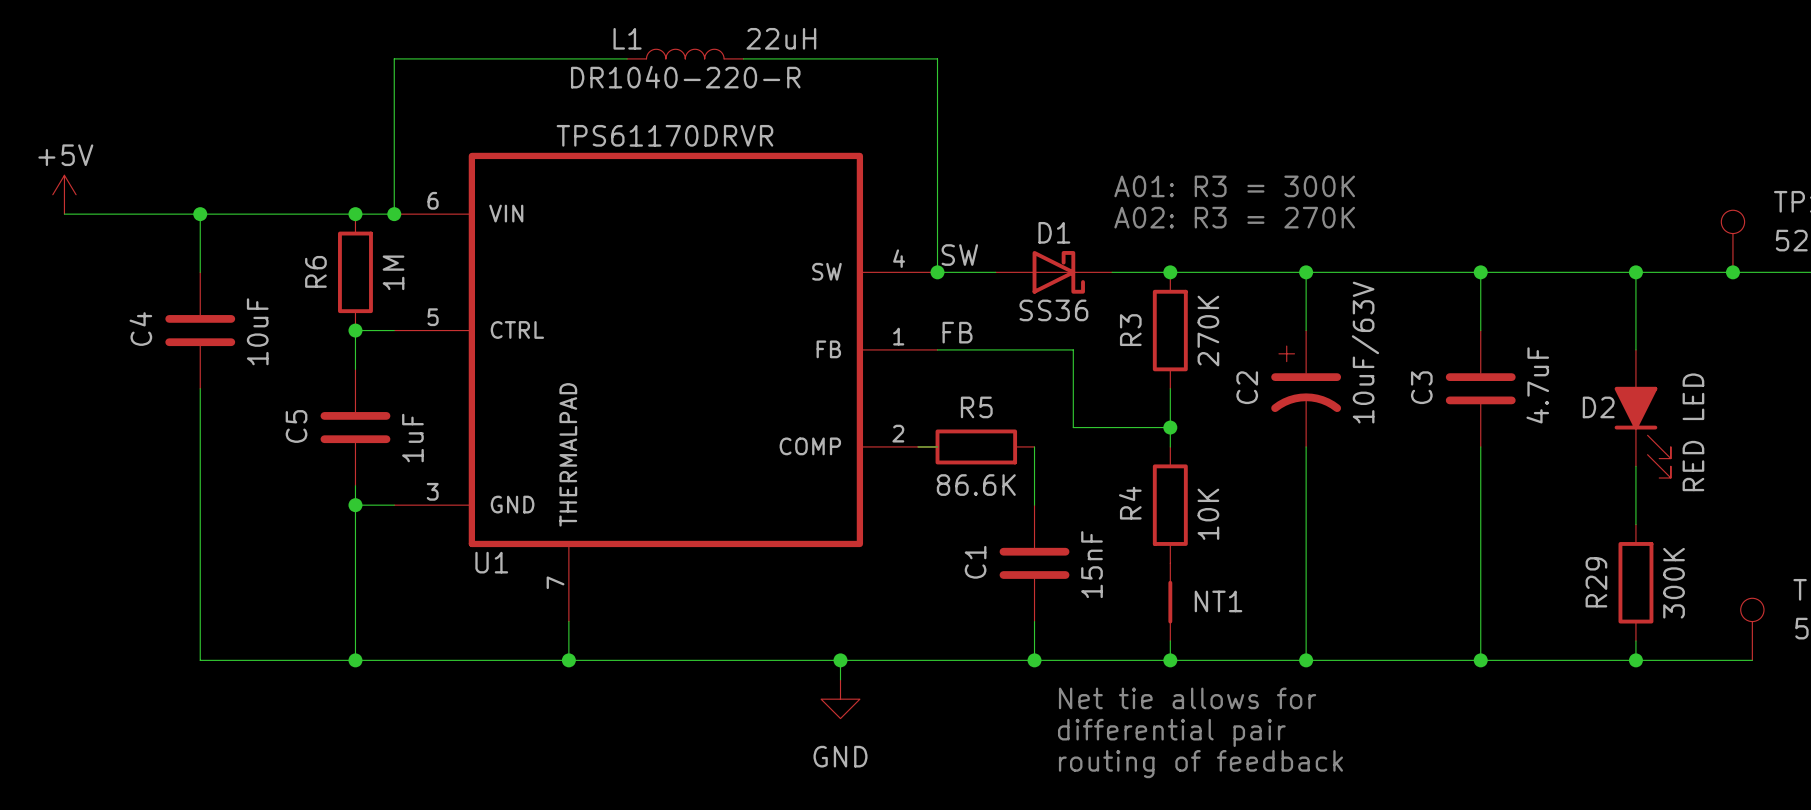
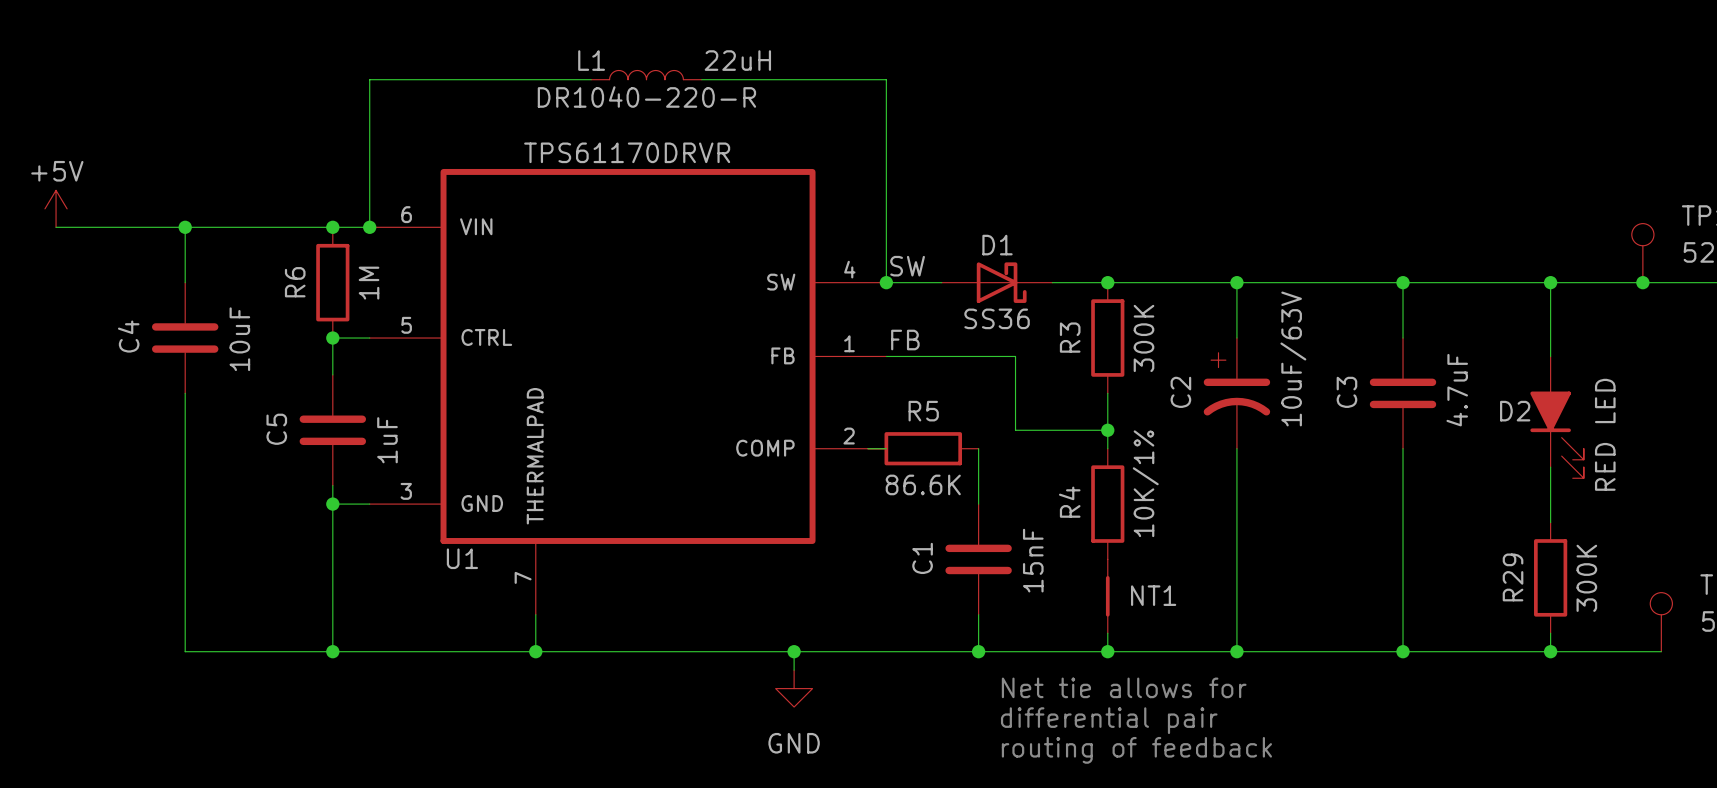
text: A01: R3 = 300K (1234, 186) -> none
text: A02: R3 = 270K (1234, 217) -> none
R3 value: 270K (1208, 331) -> 300K (1143, 338)
R4 value: 10K (1208, 514) -> 10K/1% (1145, 483)

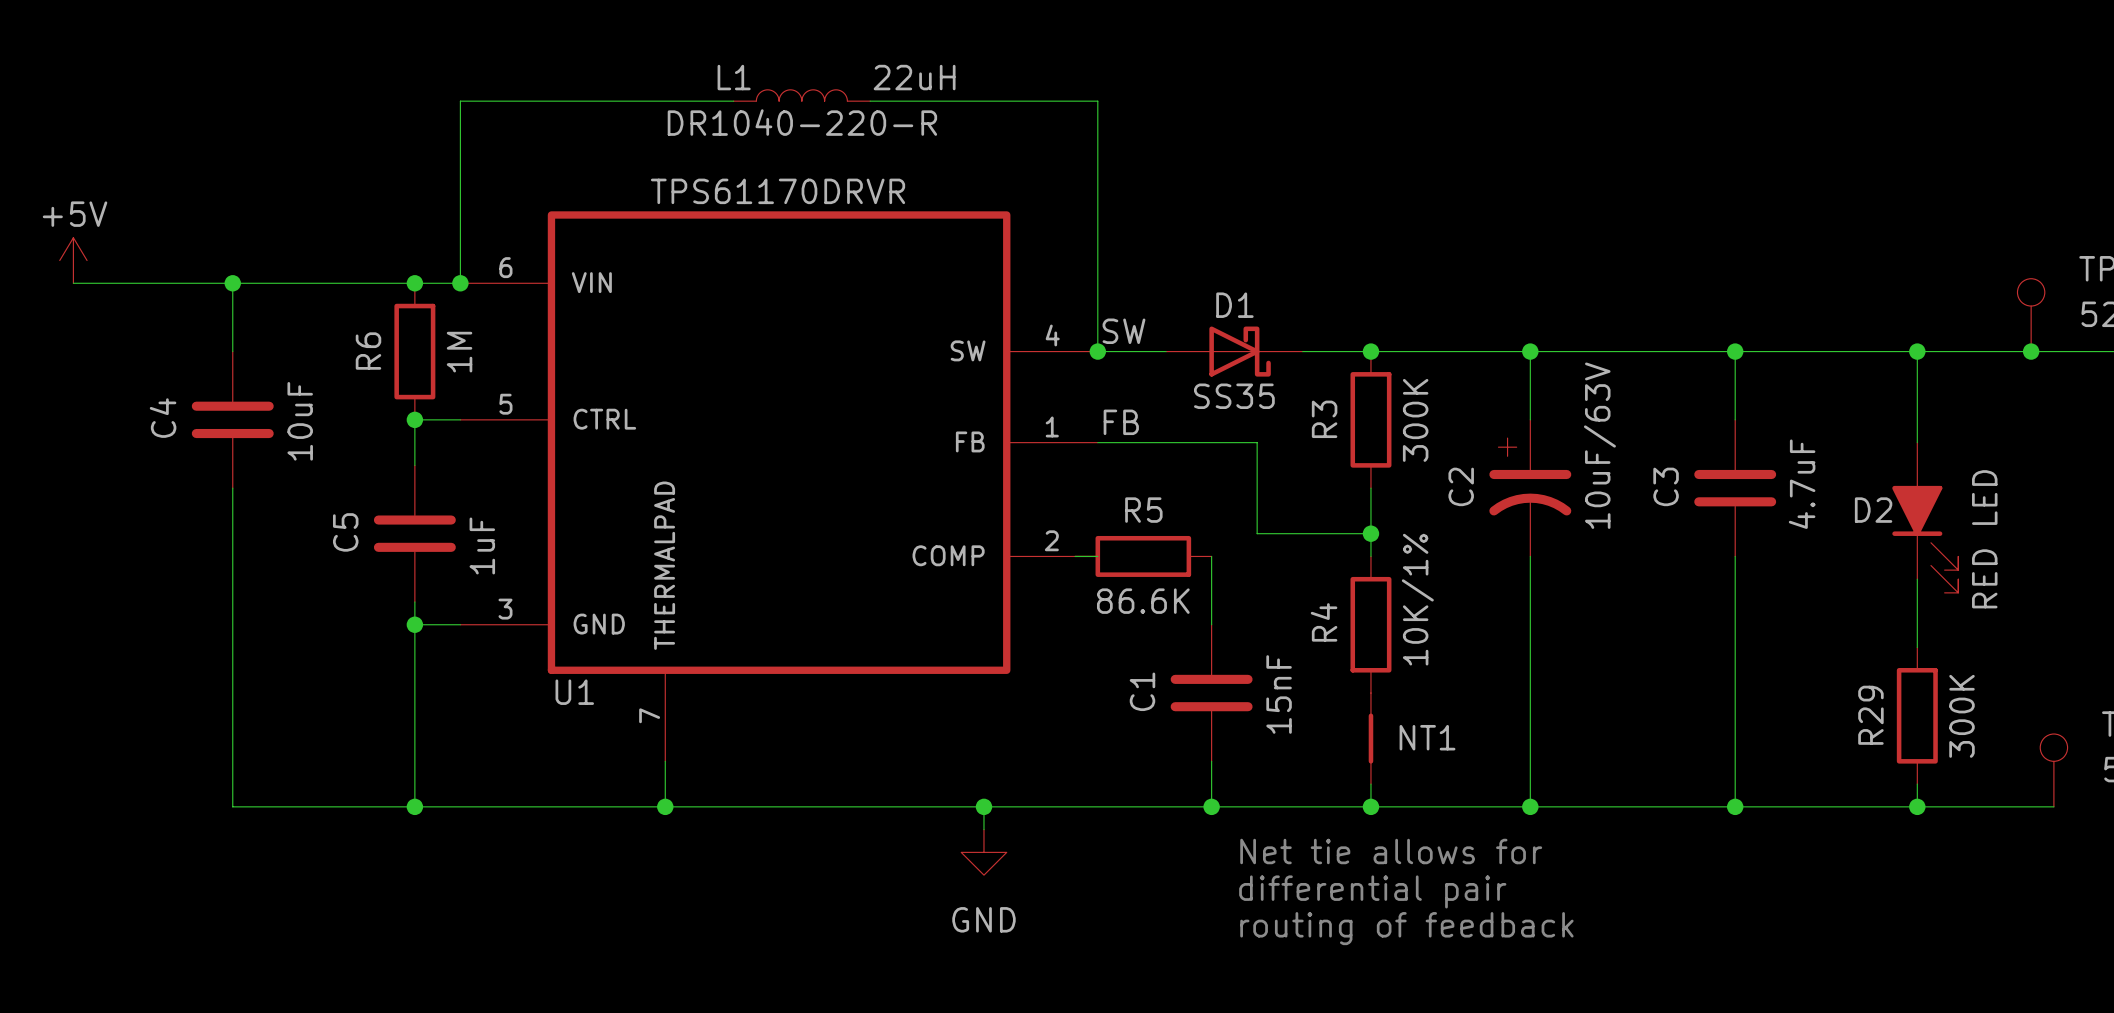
D1 value: SS36 (997, 318) -> SS35 (1234, 396)

